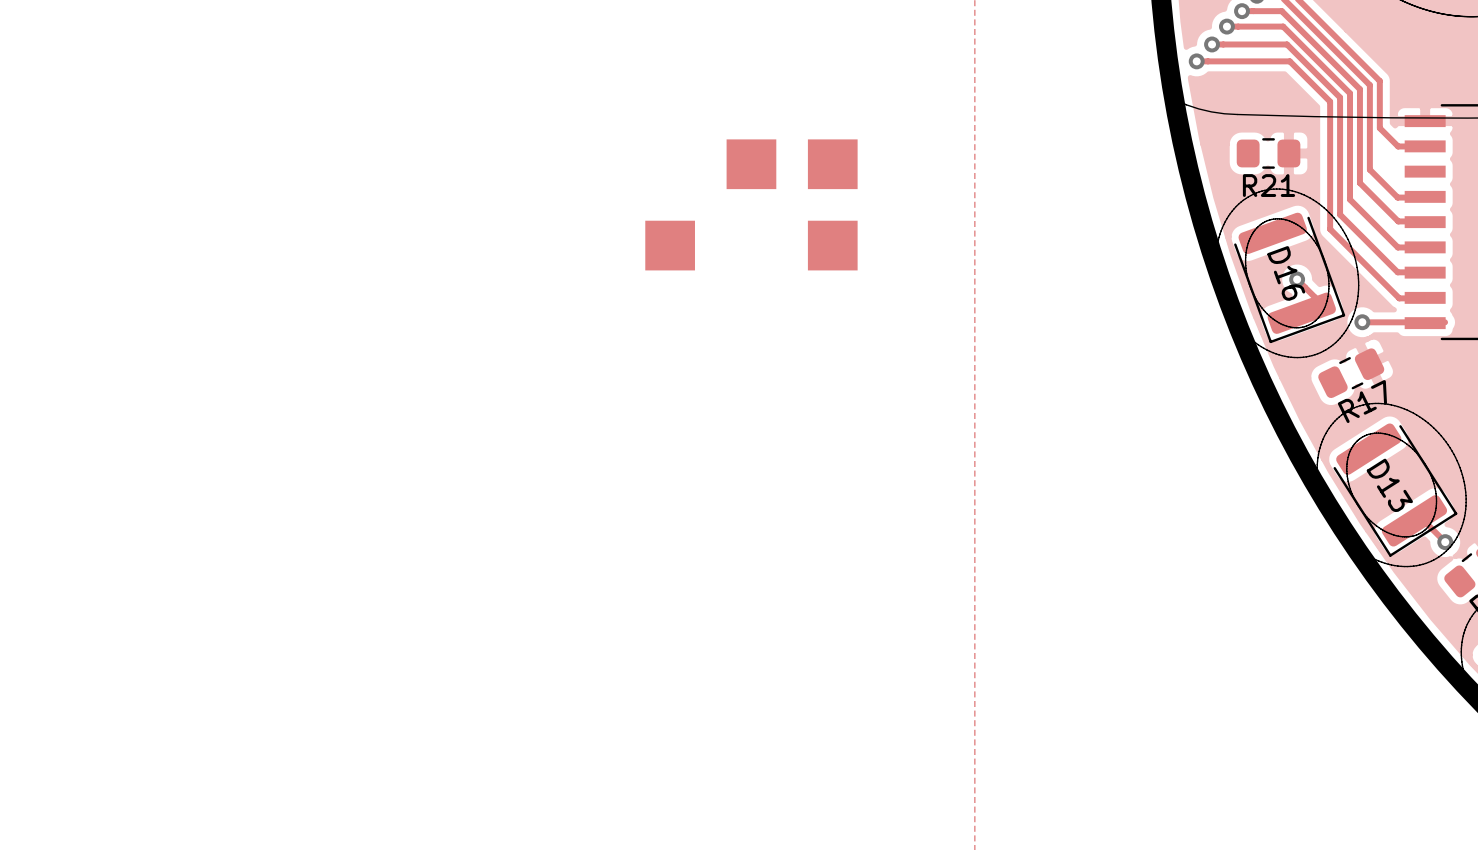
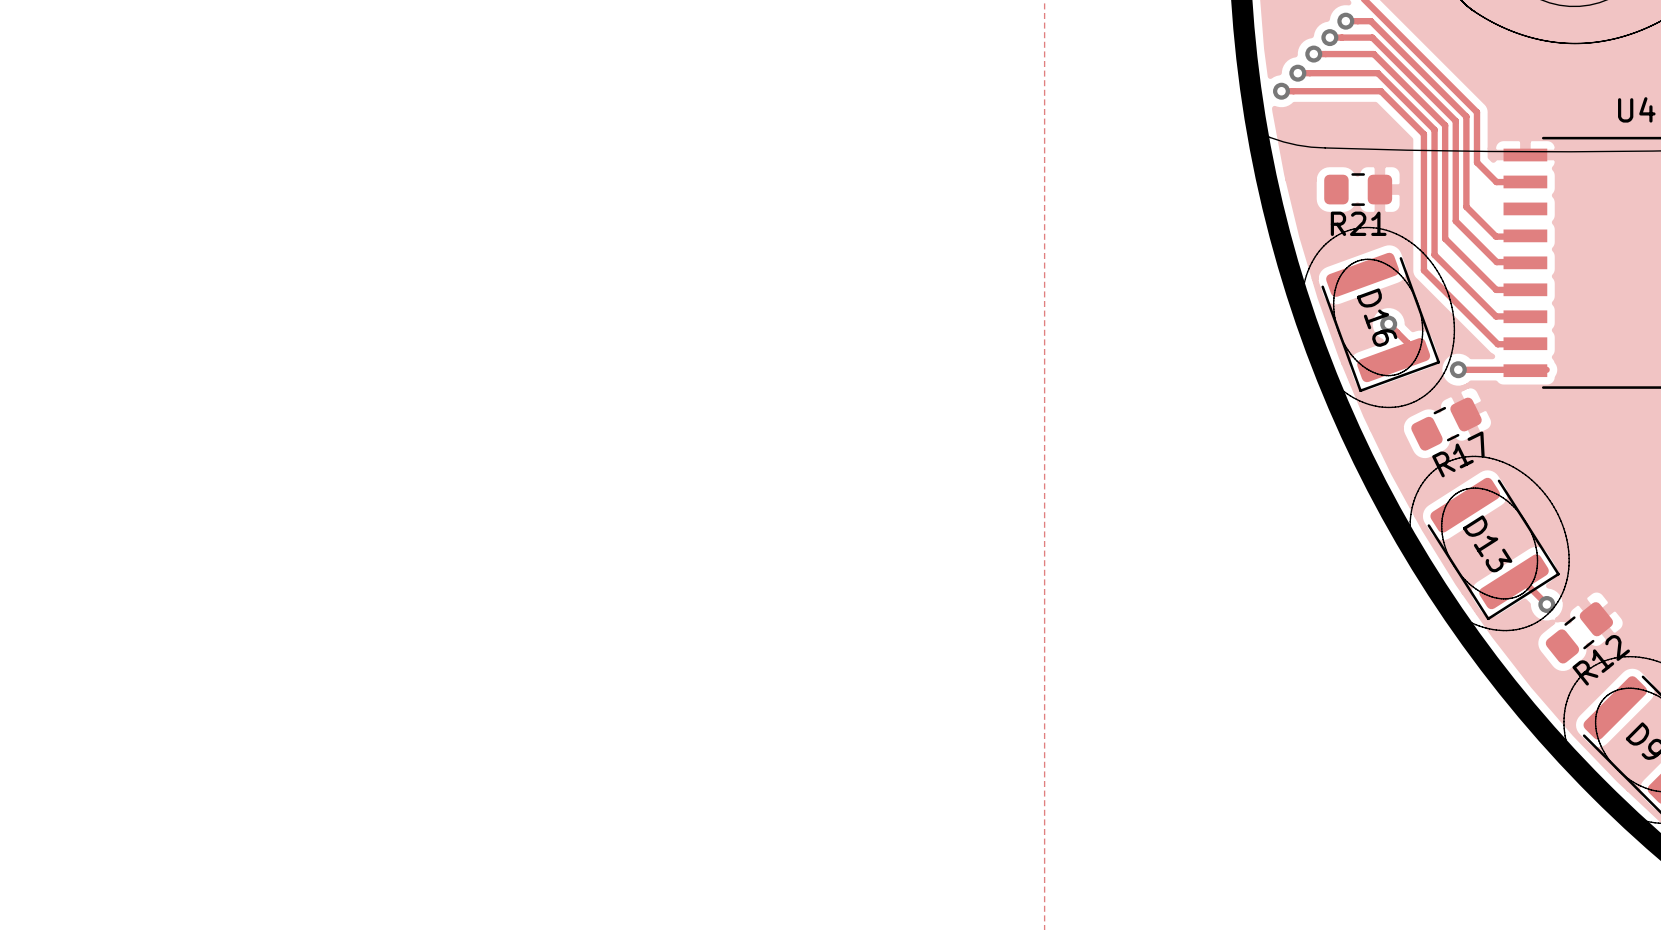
part: (751, 164) -> none
part: (832, 164) -> none
part: (670, 245) -> none
part: (832, 245) -> none

